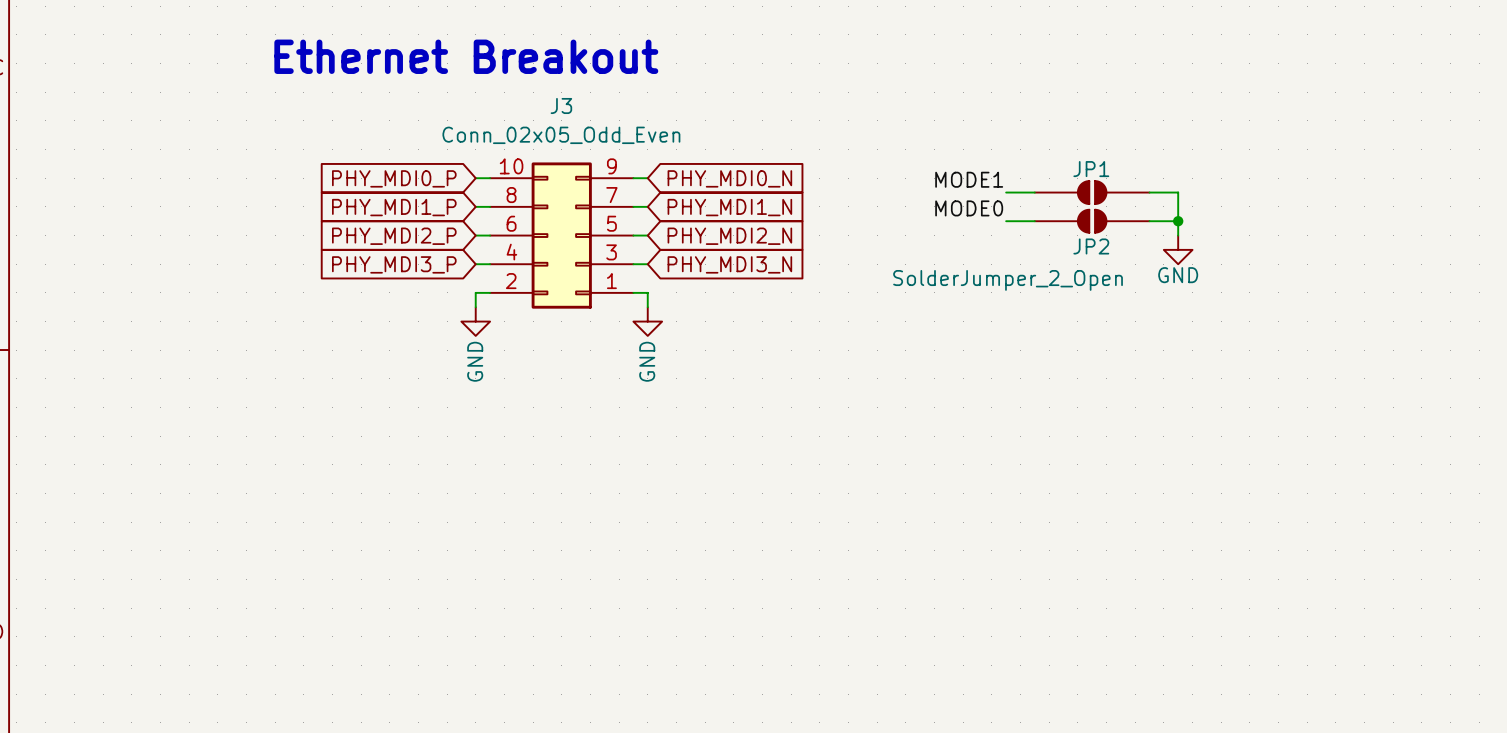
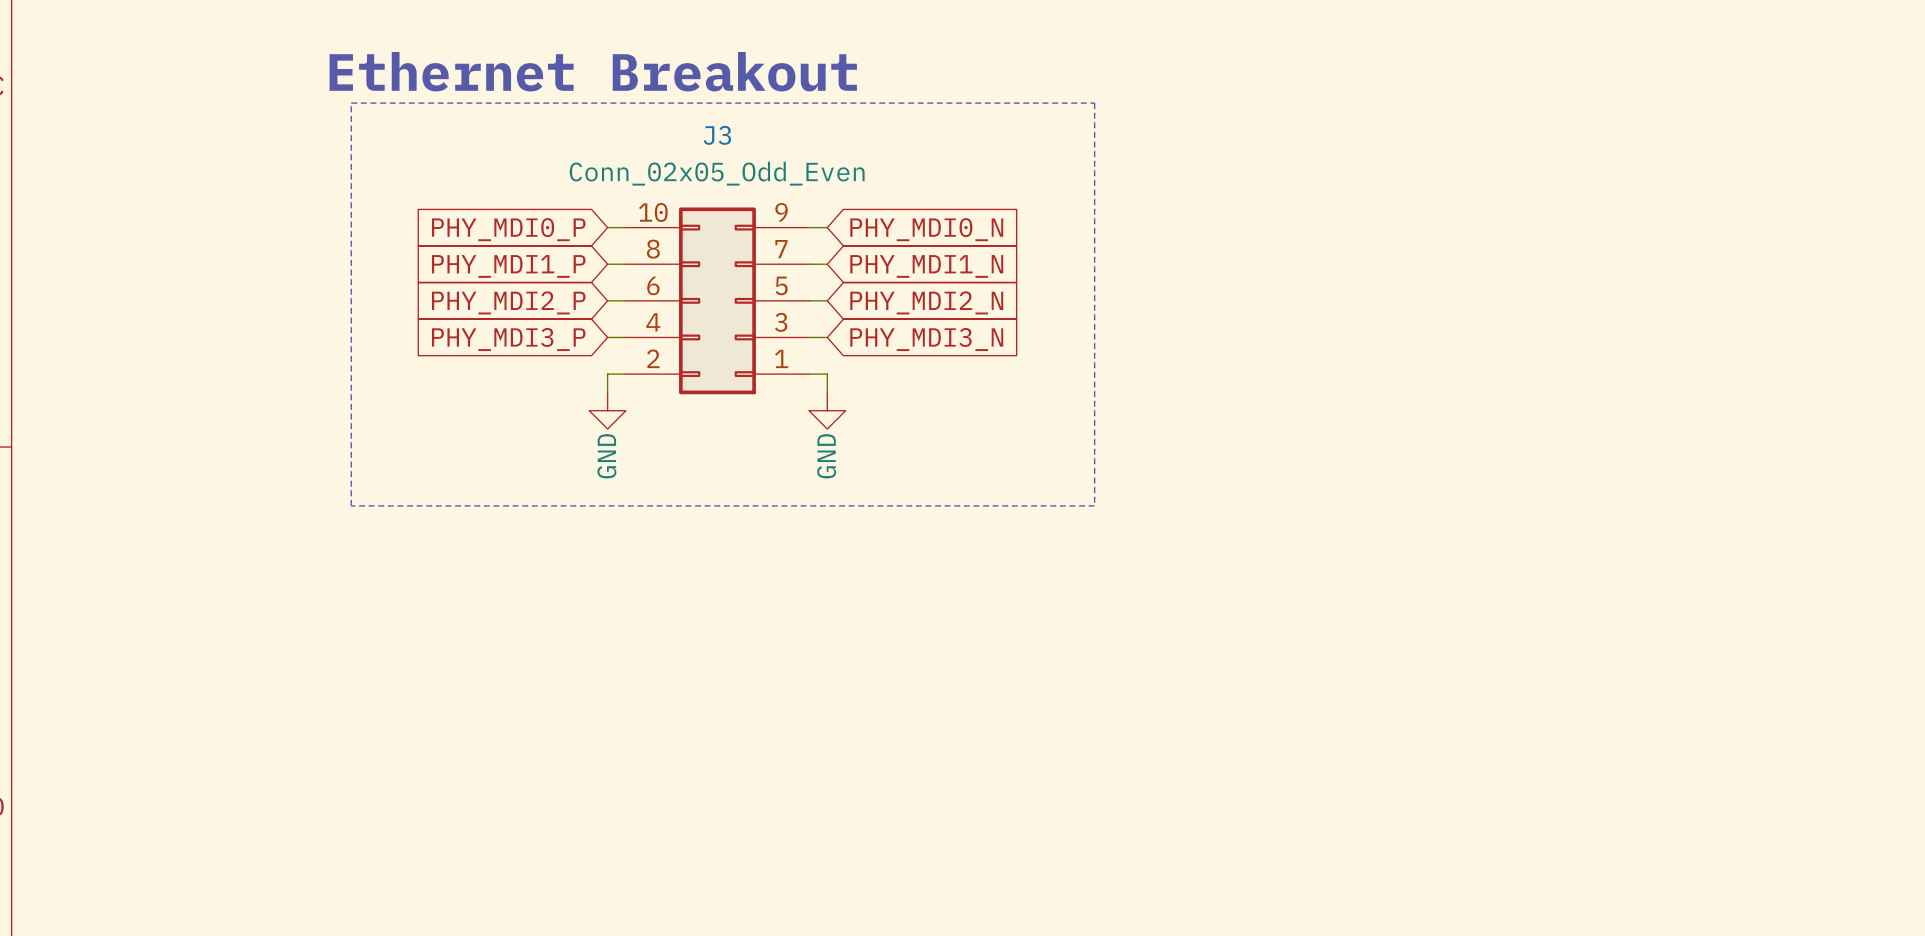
line: none -> (351, 103) (1094, 103) (1094, 505) (351, 505) (351, 103)
label: MODE1 (969, 179) -> none
wire: (1006, 192) (1034, 192) -> none
JP1: (1092, 192) -> none
wire: (1149, 192) (1178, 192) (1178, 235) -> none
label: MODE0 (969, 208) -> none
wire: (1006, 221) (1034, 221) -> none
JP2: SolderJumper_2_Open (1092, 221) -> none
wire: (1149, 221) (1178, 221) -> none
junction: (1178, 221) -> none
power symbol: GND (1178, 249) -> none

